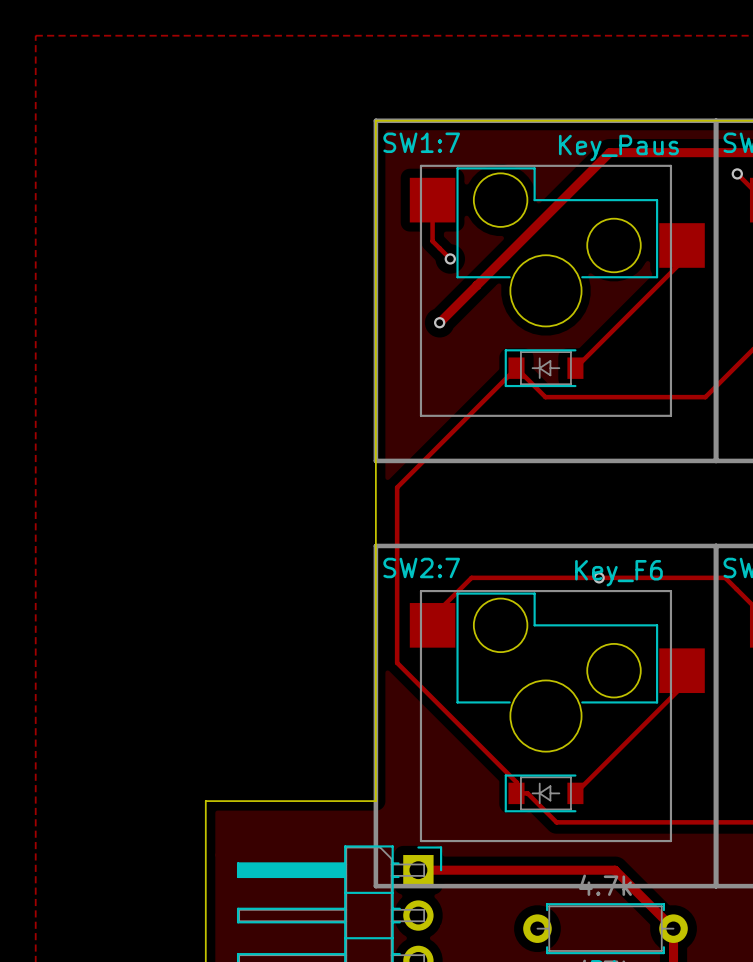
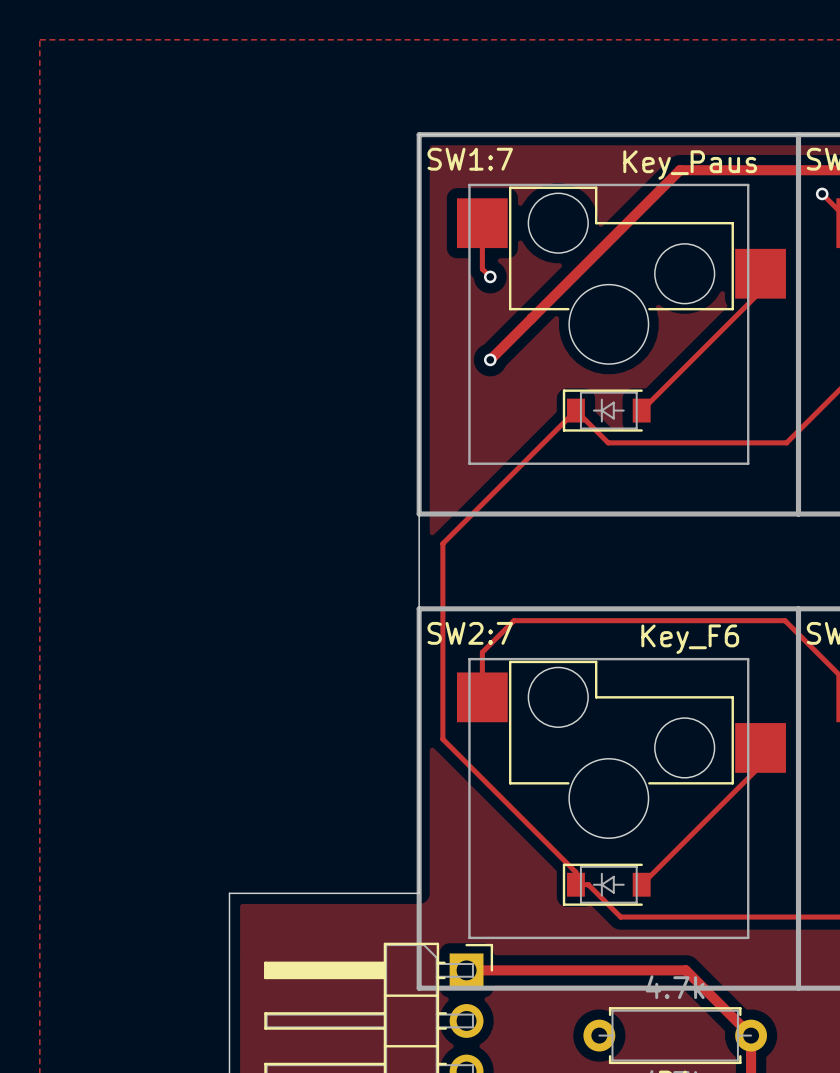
track: (439, 248) (450, 258) -> none
via position: (450, 258) -> (490, 276)
via: (599, 577) -> none
track: (725, 577) (471, 577) (432, 616) -> (808, 644) (785, 620) (514, 620) (482, 652) (482, 687)

